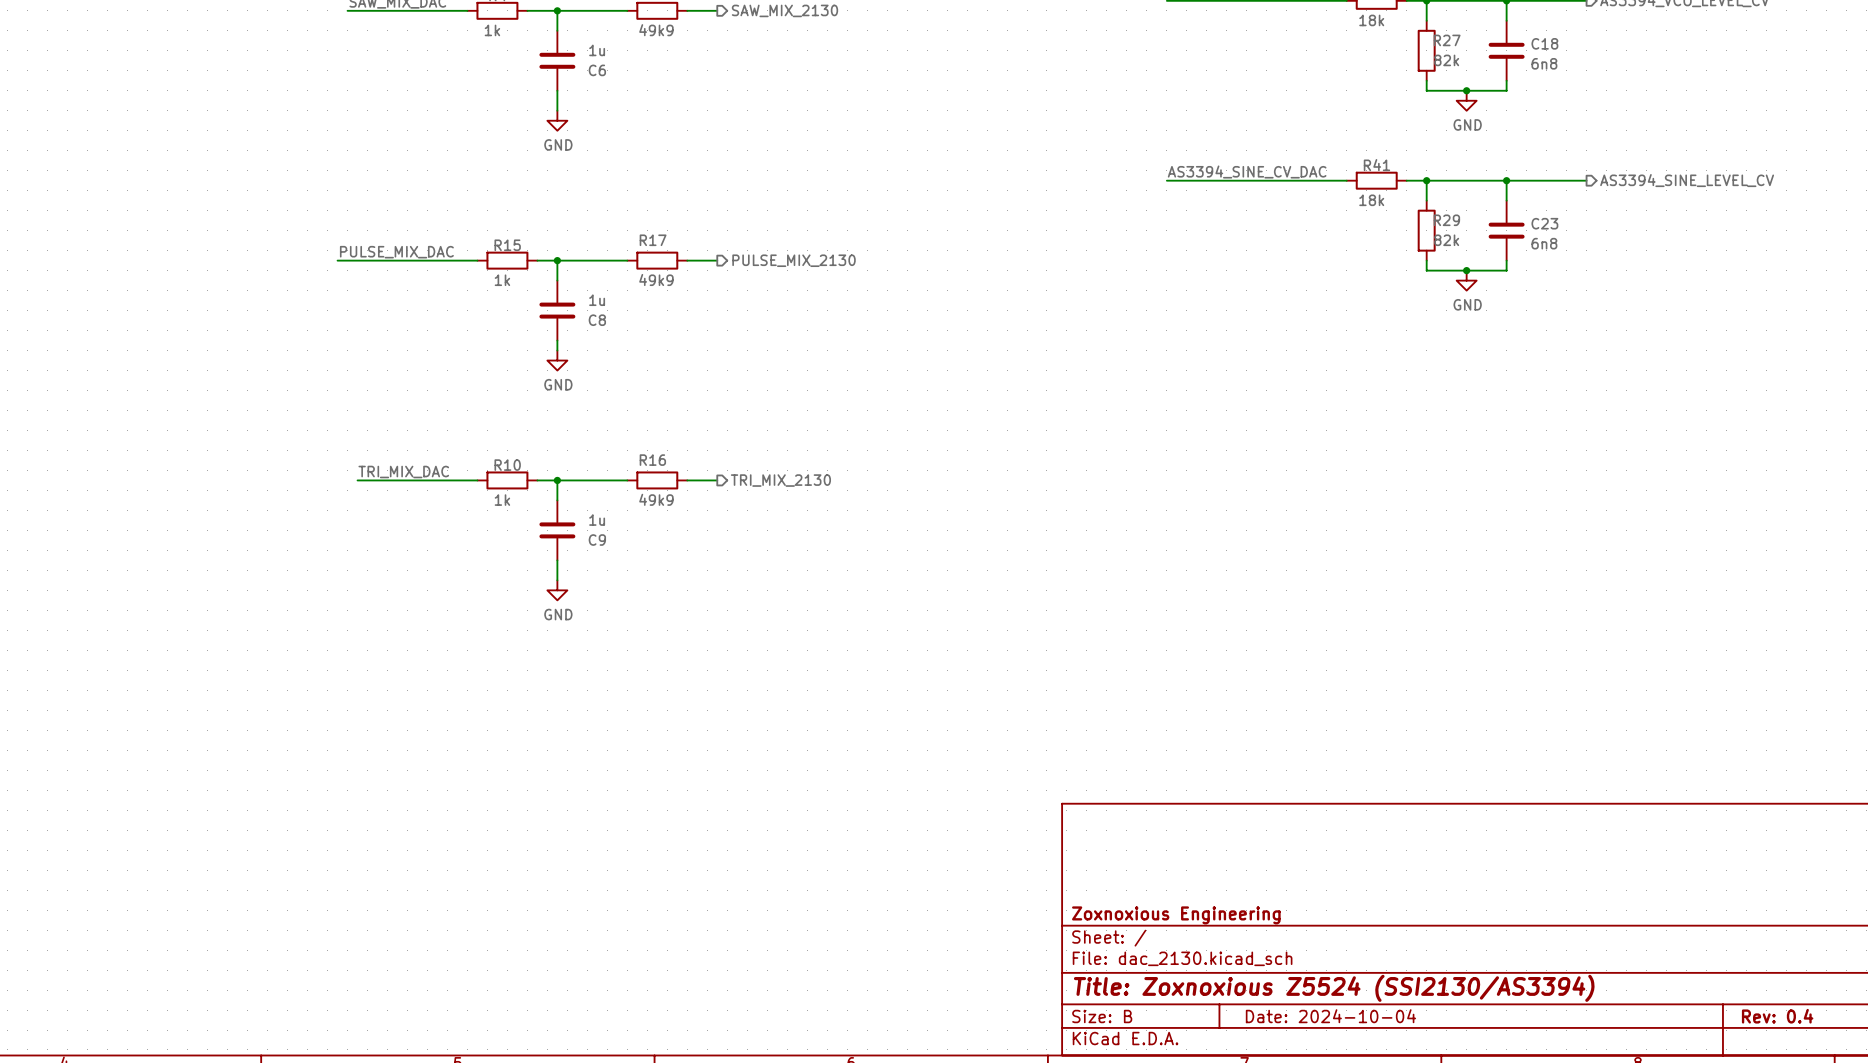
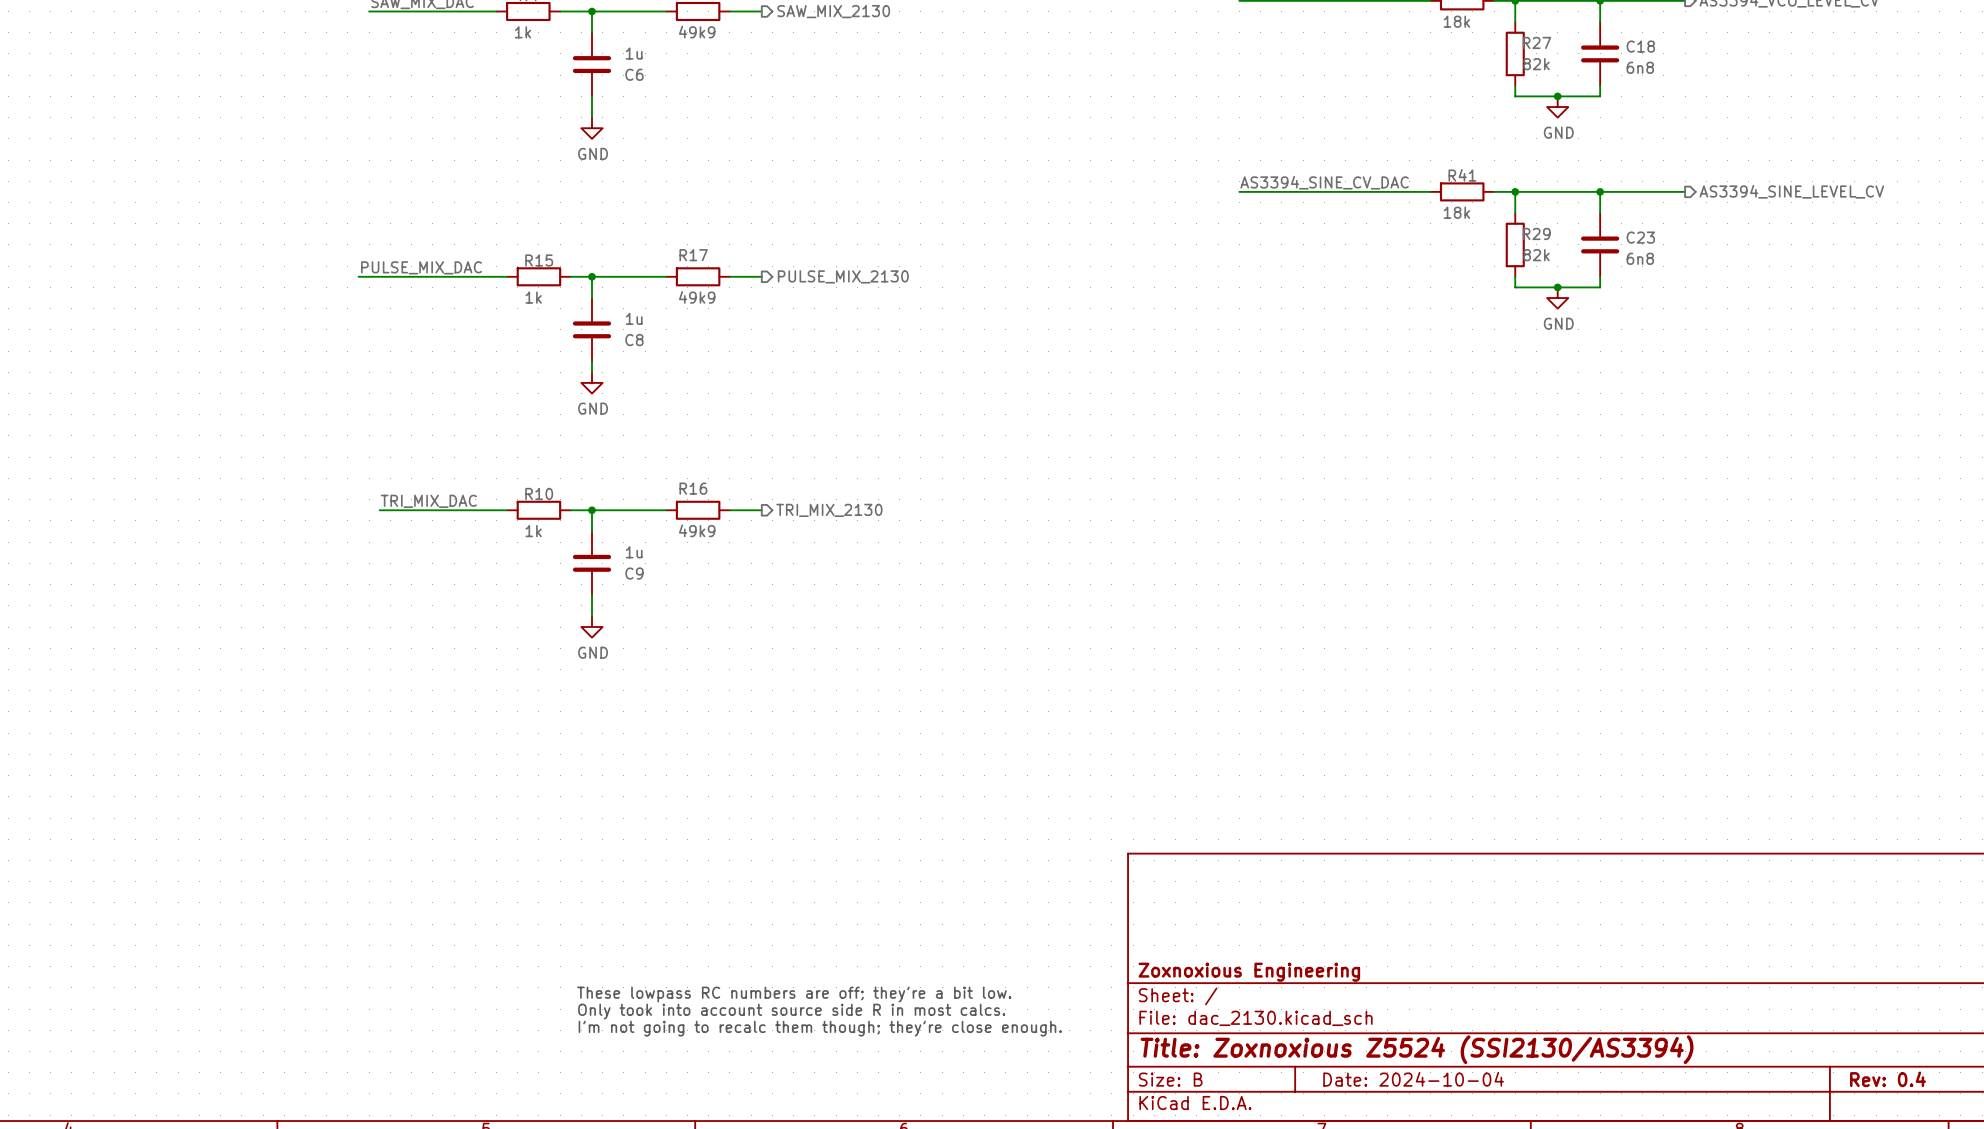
text: none -> These lowpass RC numbers are off; they're a bit low. (794, 994)
text: none -> Only took into account source side R in most calcs. (791, 1011)
text: none -> I'm not going to recalc them though; they're close enough. (820, 1028)

